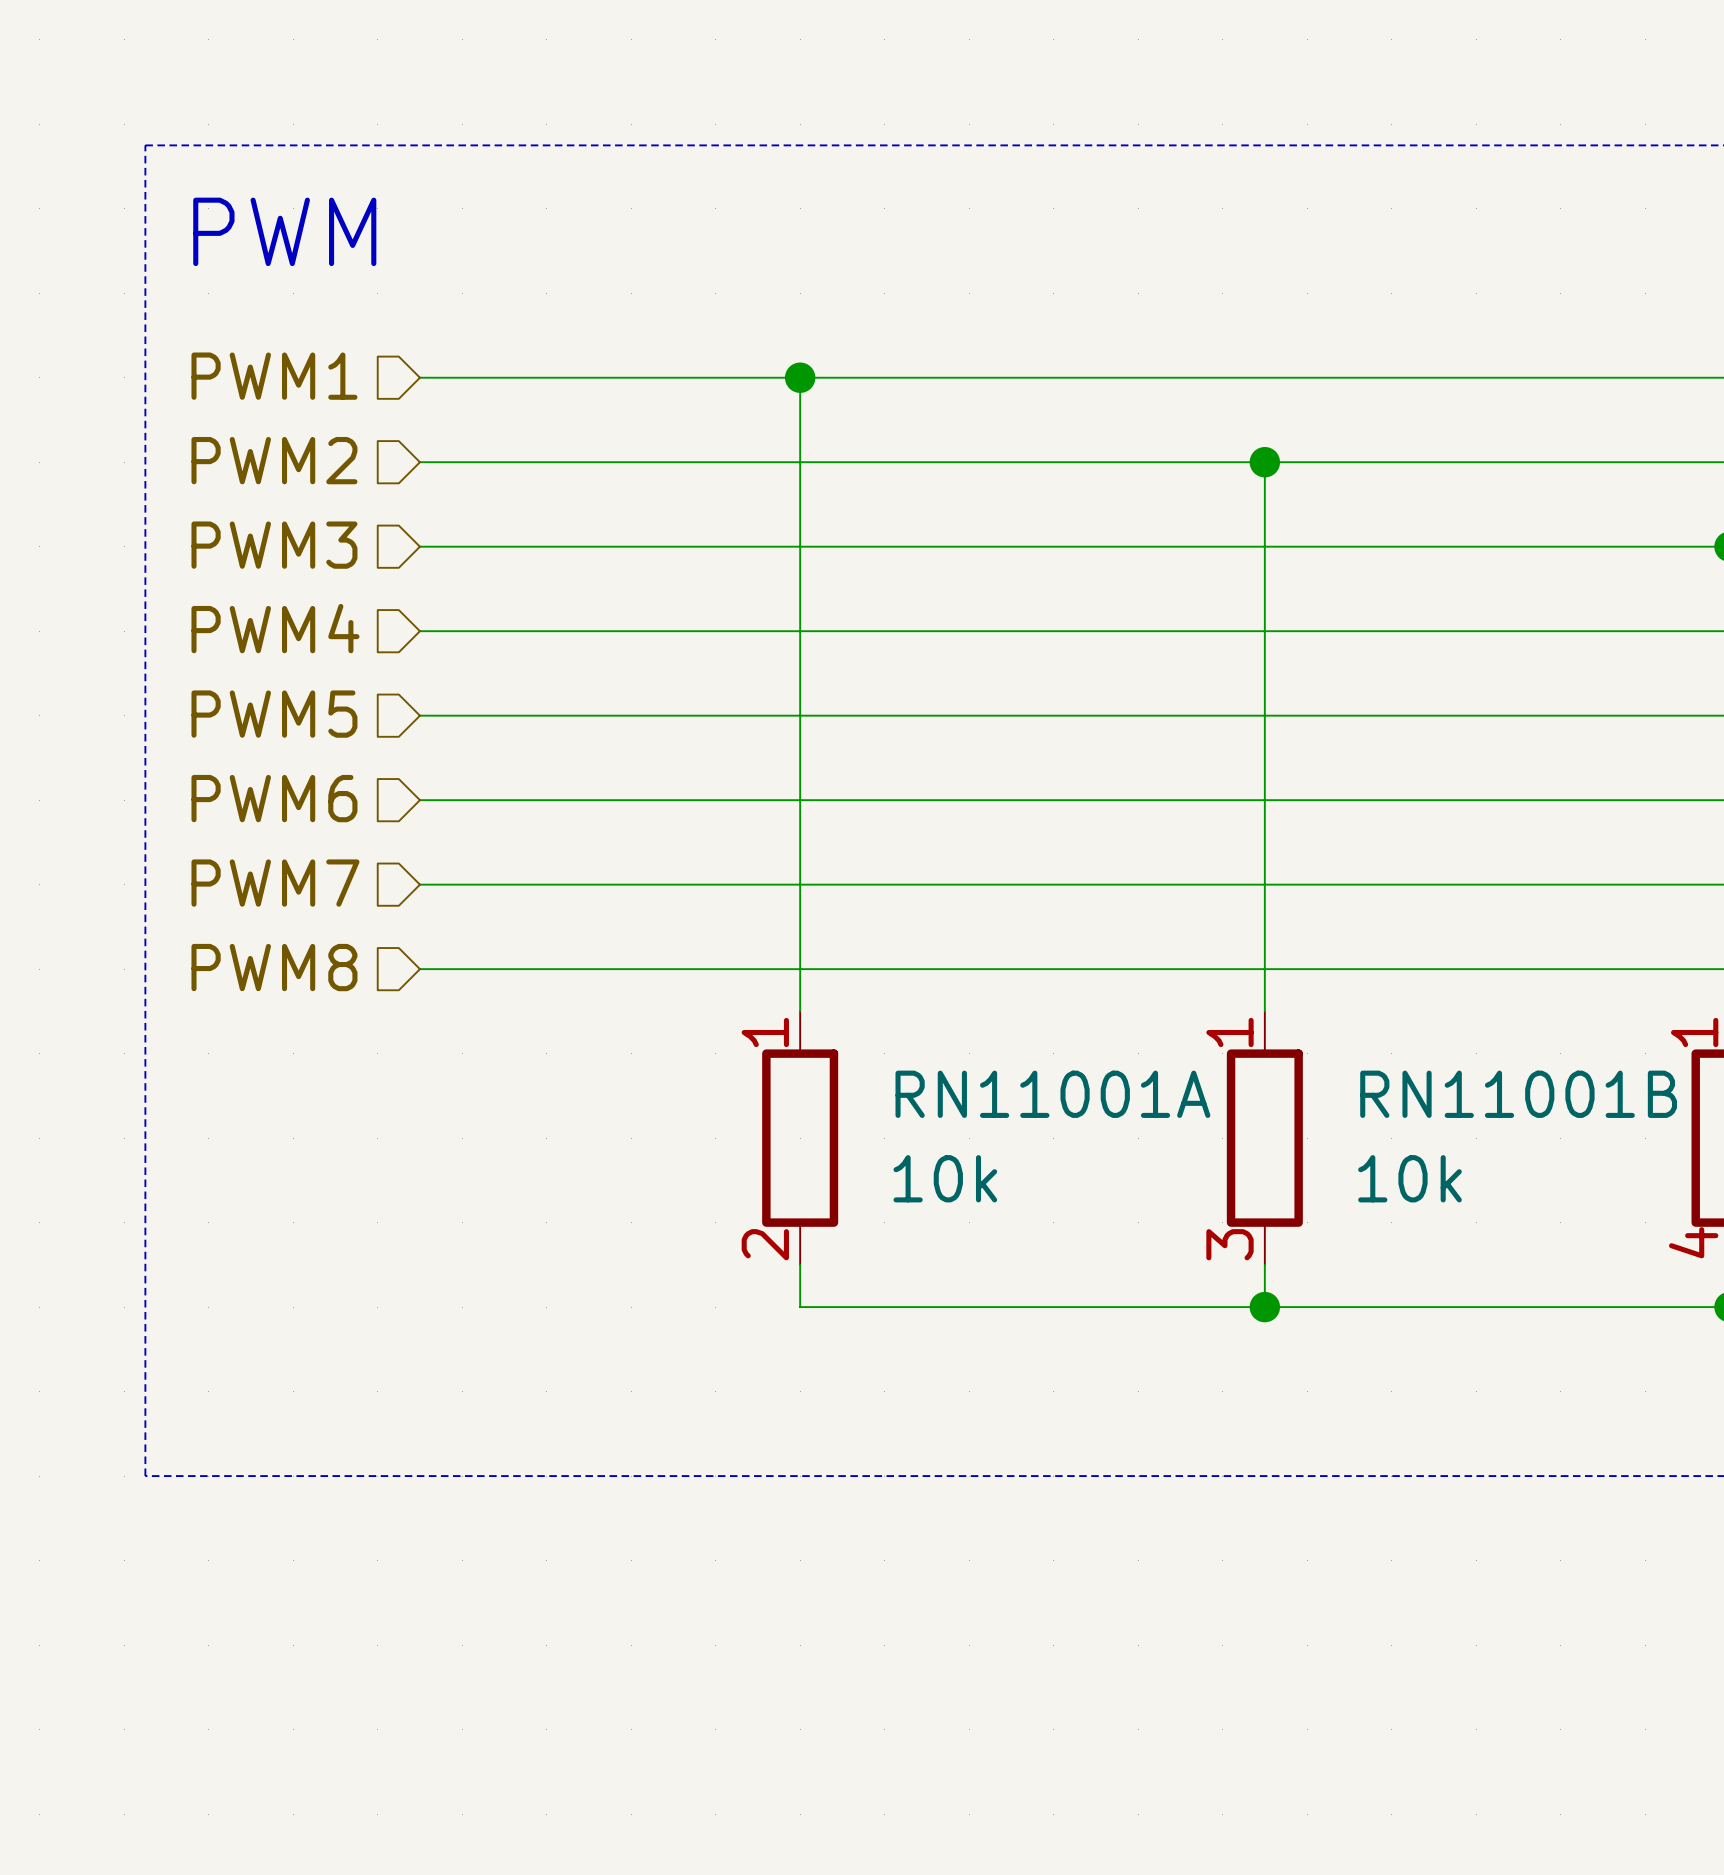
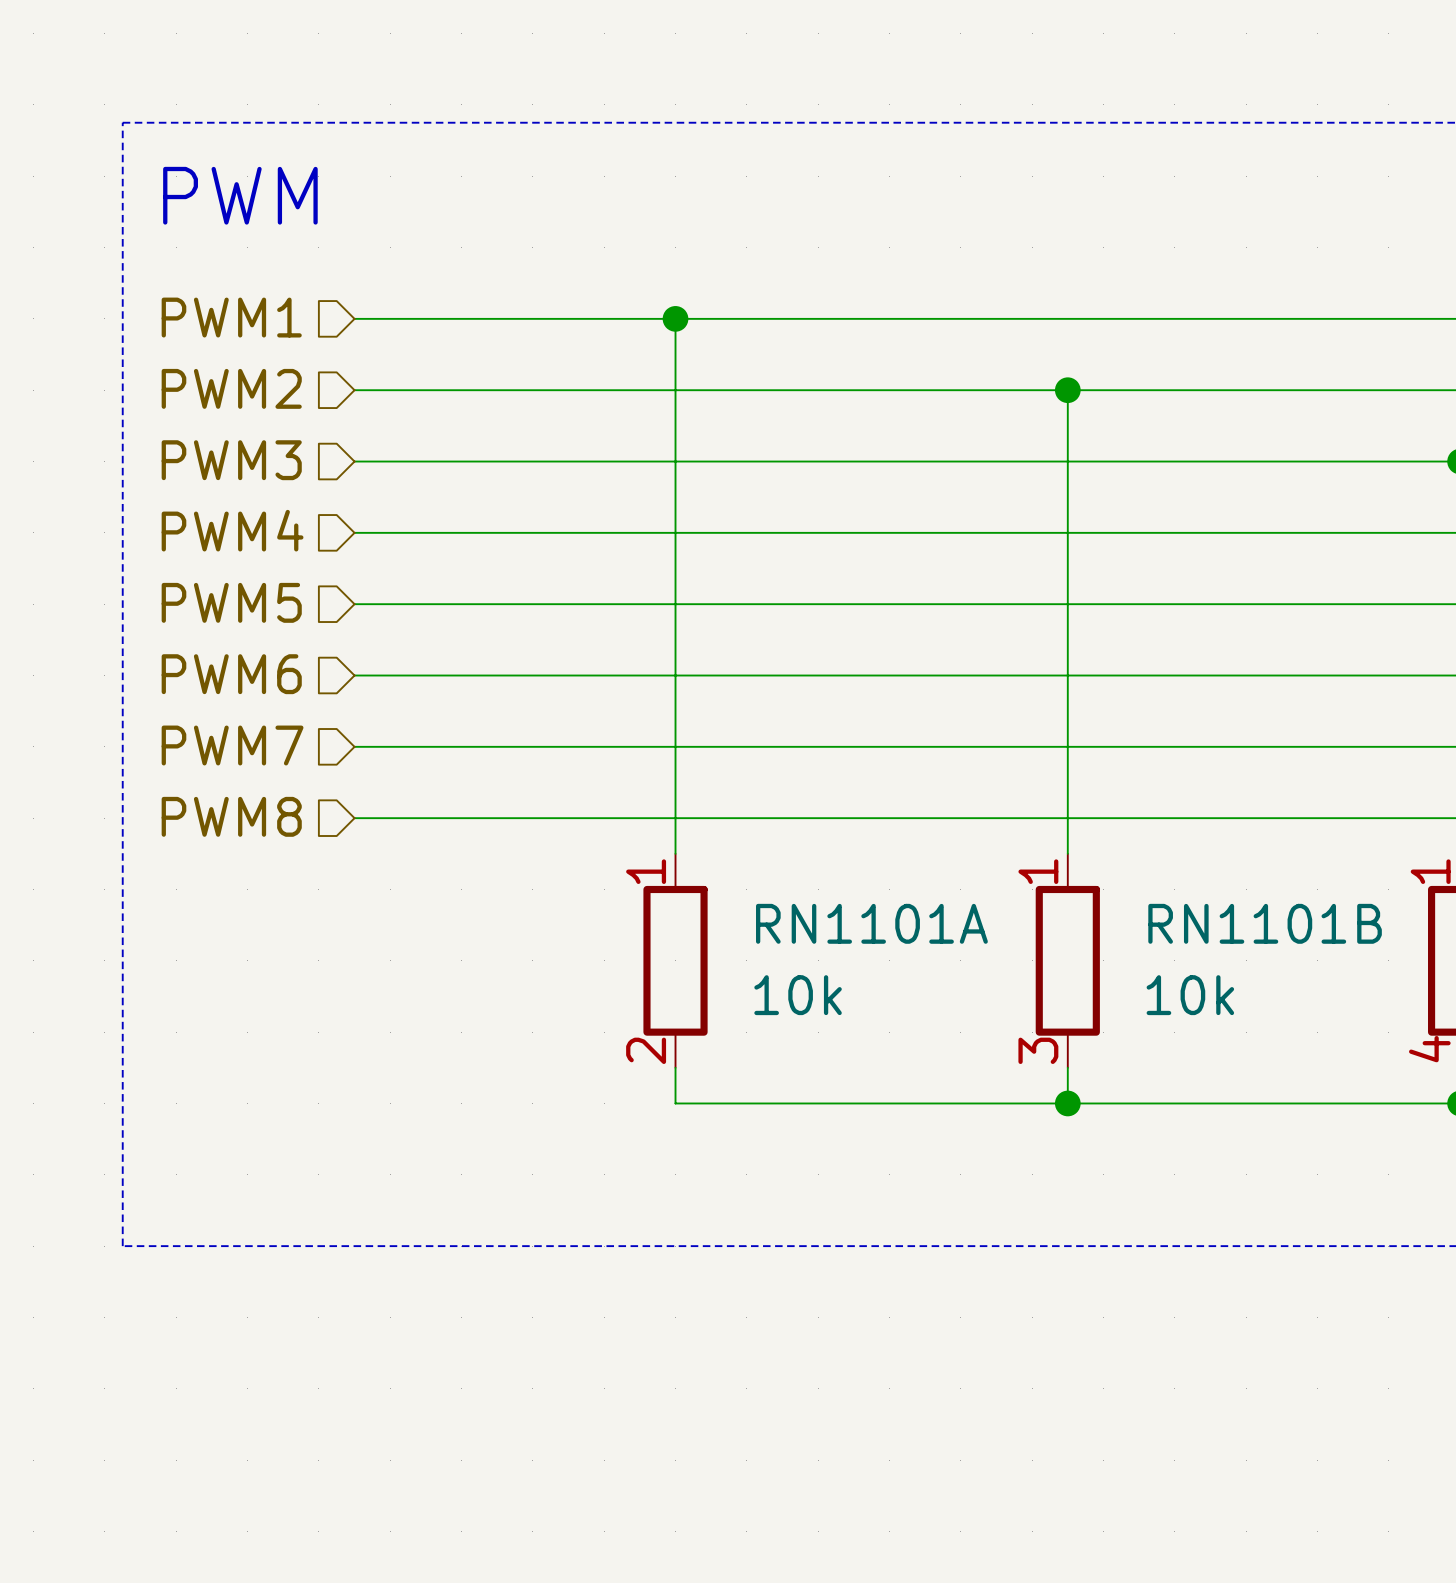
RN11001A name: RN11001A (1052, 1094) -> RN1101A (871, 923)
RN11001B name: RN11001B (1518, 1094) -> RN1101B (1265, 923)

